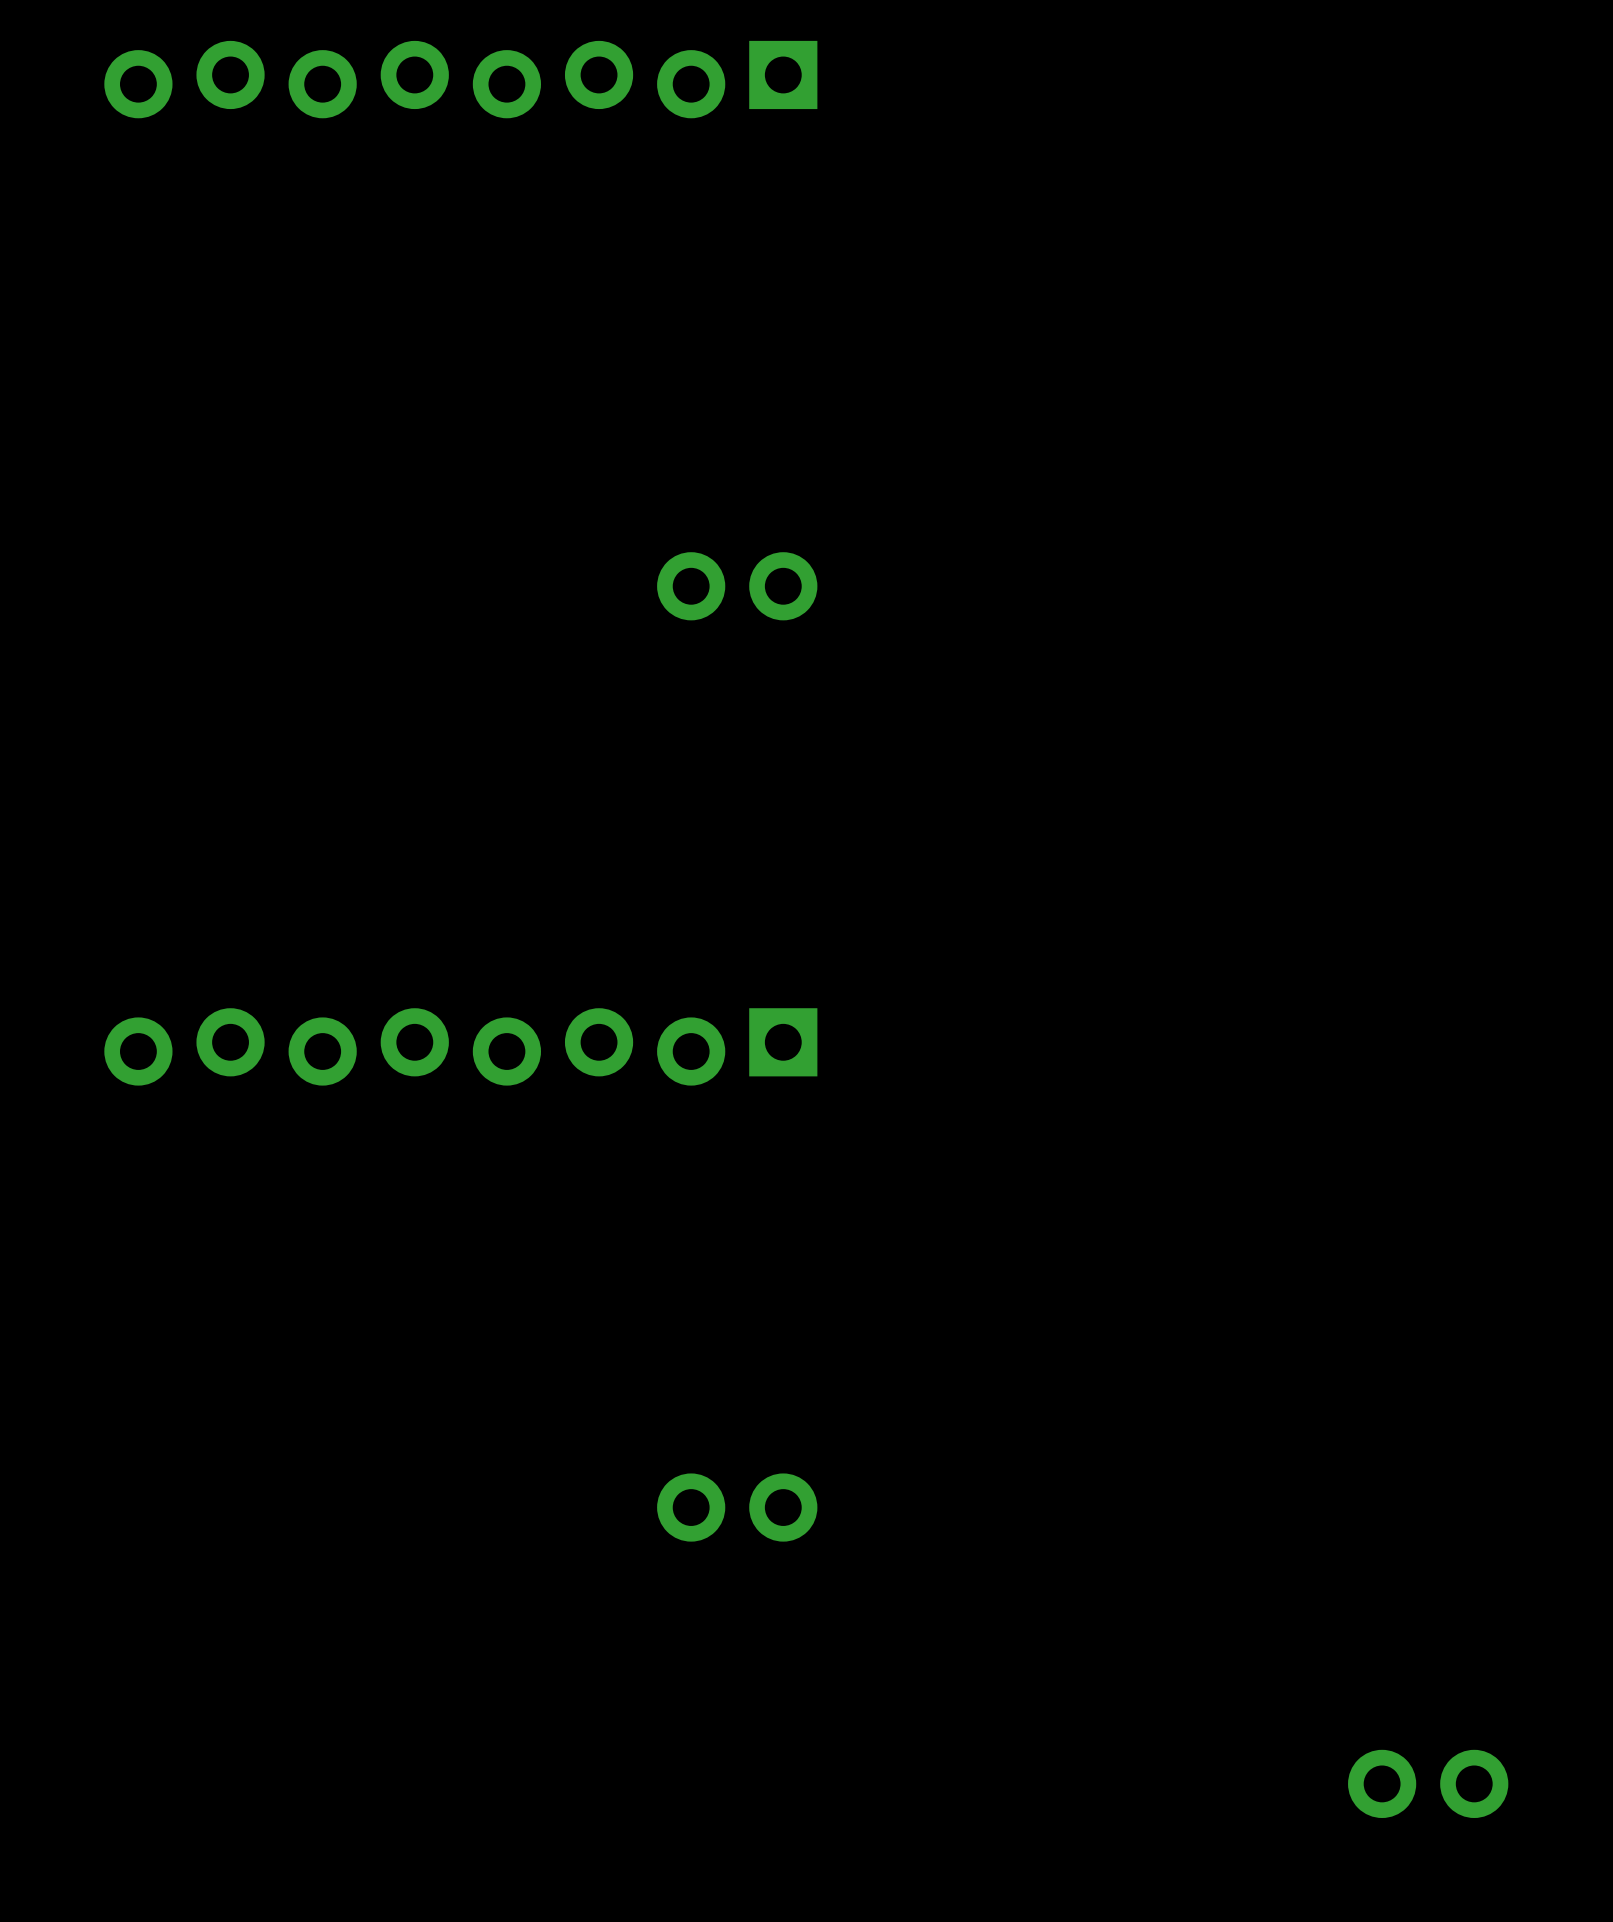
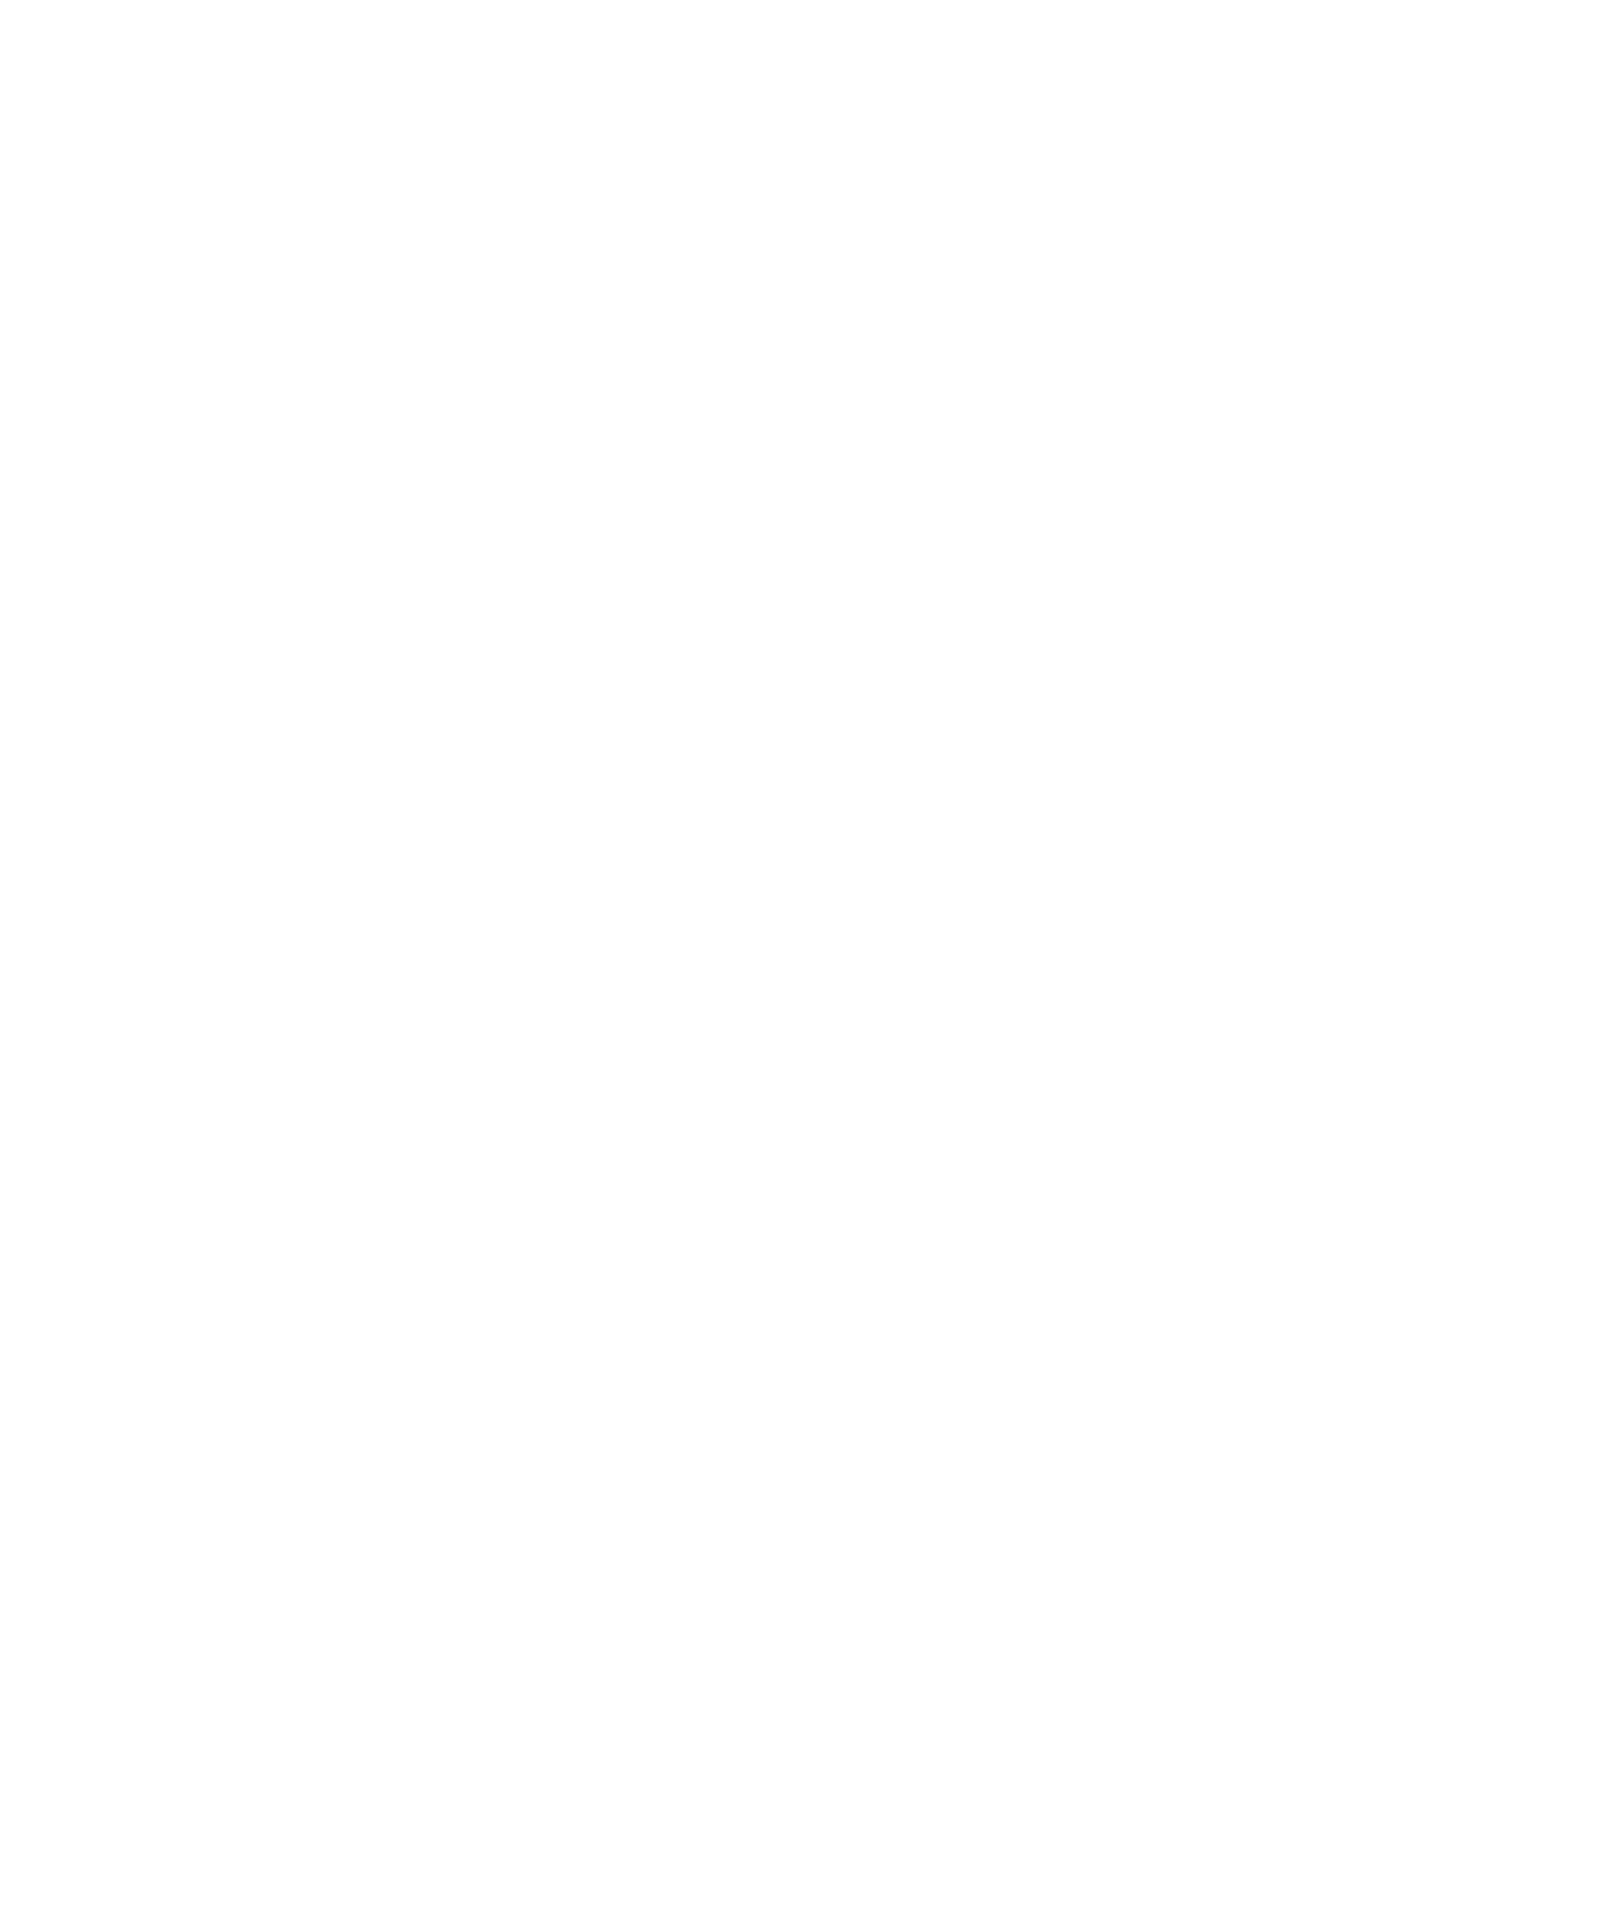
part: (460, 79) -> none
part: (737, 586) -> none
part: (460, 1046) -> none
part: (737, 1507) -> none
part: (1428, 1783) -> none

